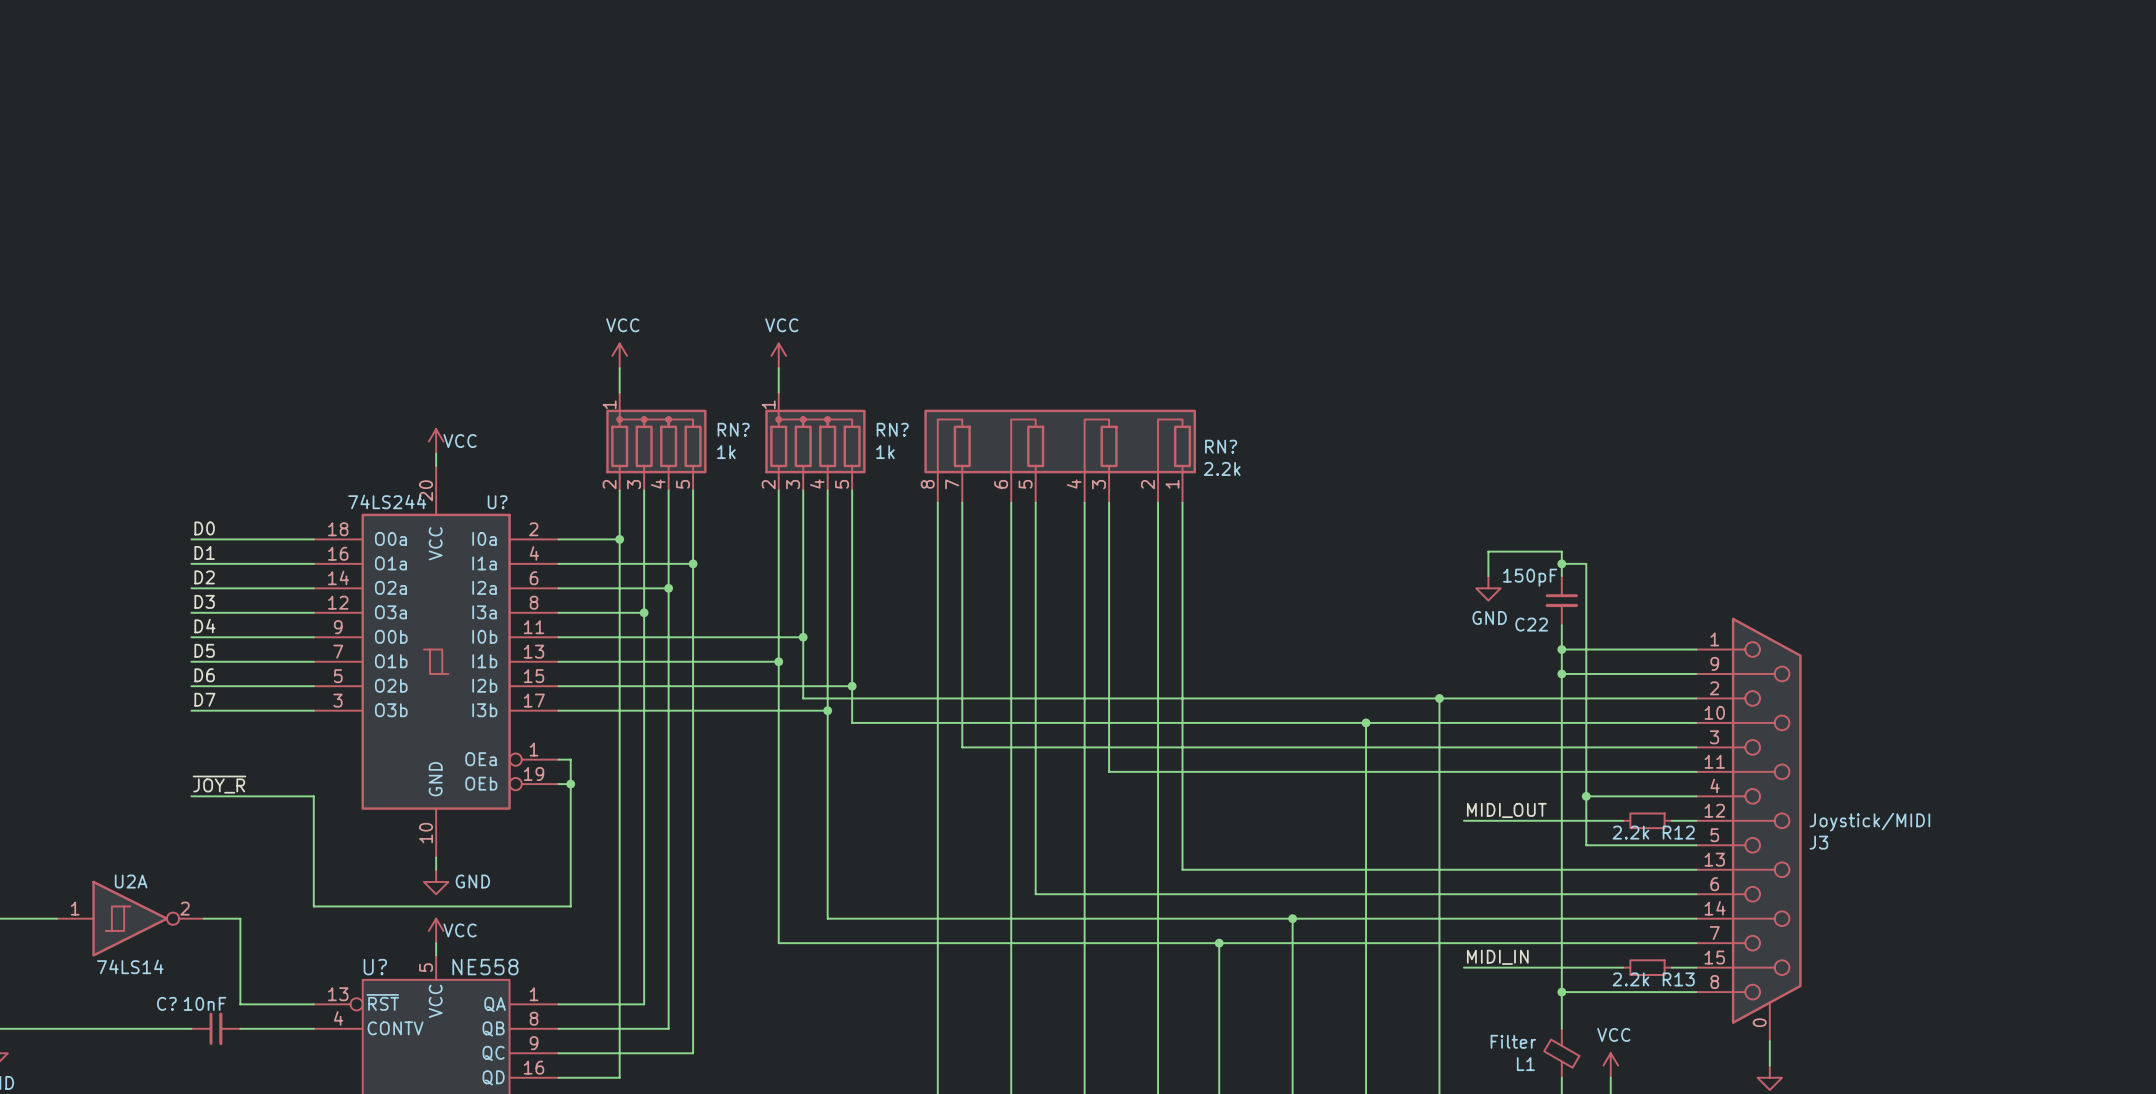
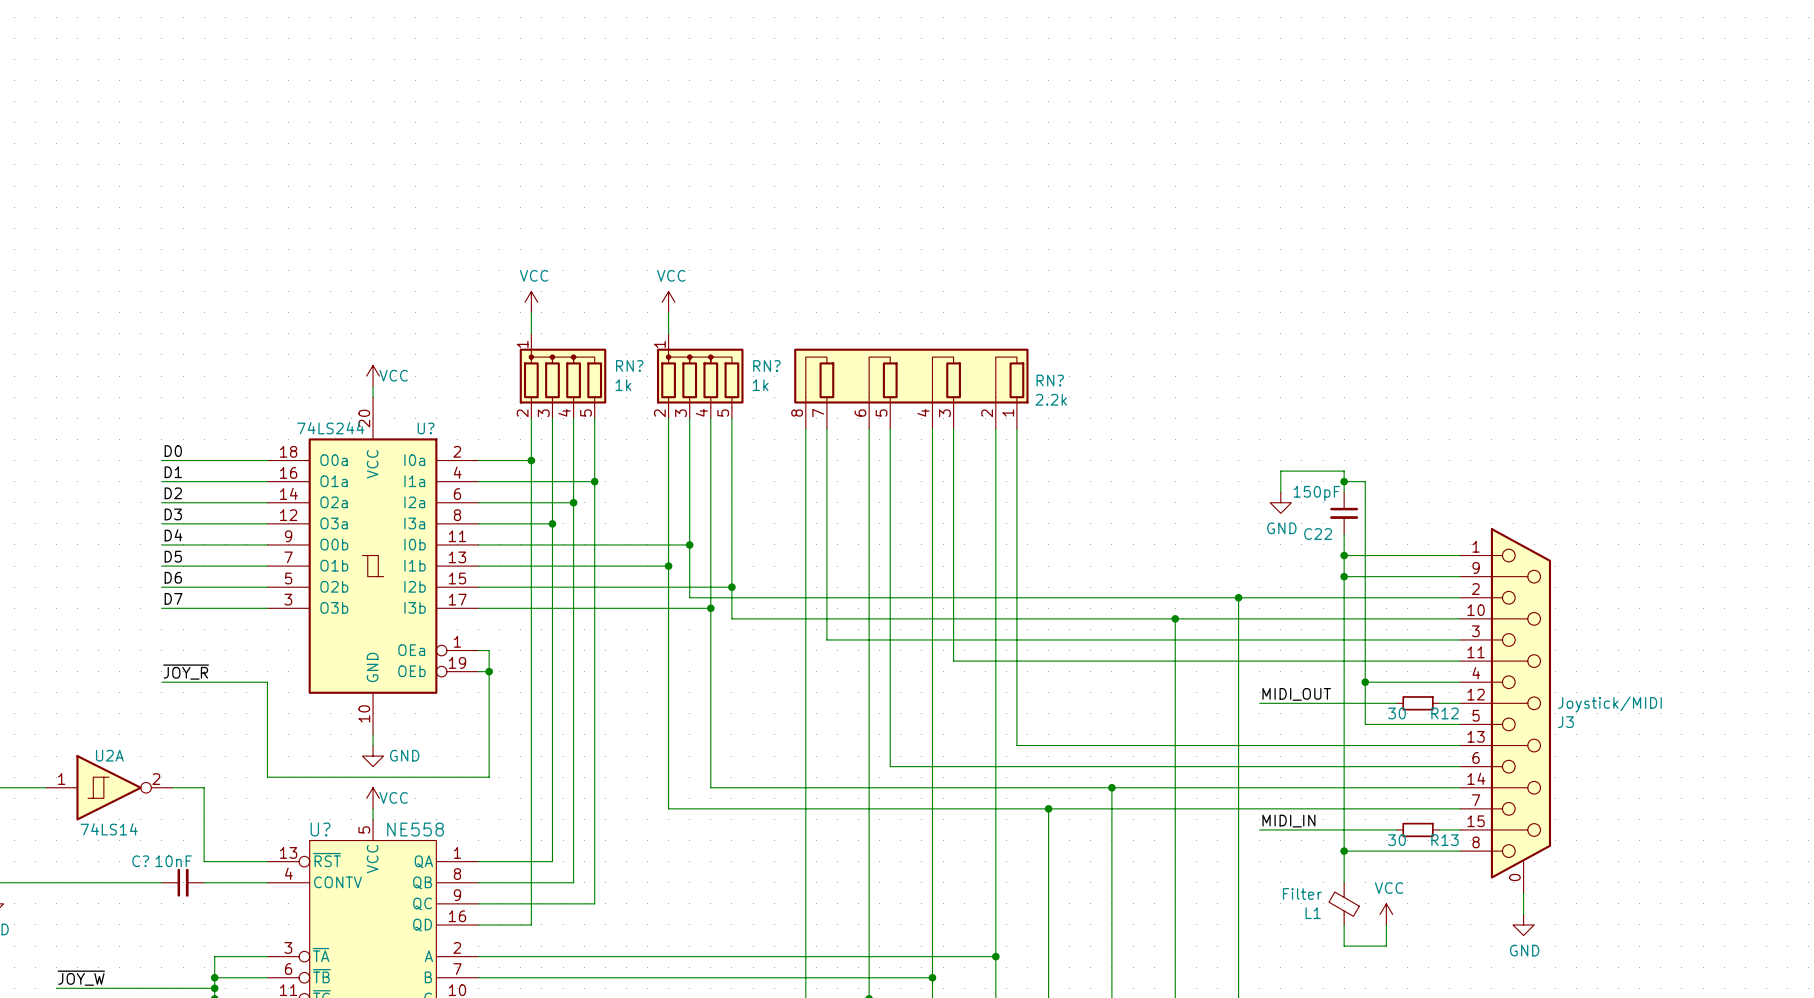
R12 value: 2.2k (1630, 832) -> 30 (1397, 713)
R13 value: 2.2k (1630, 979) -> 30 (1397, 840)

